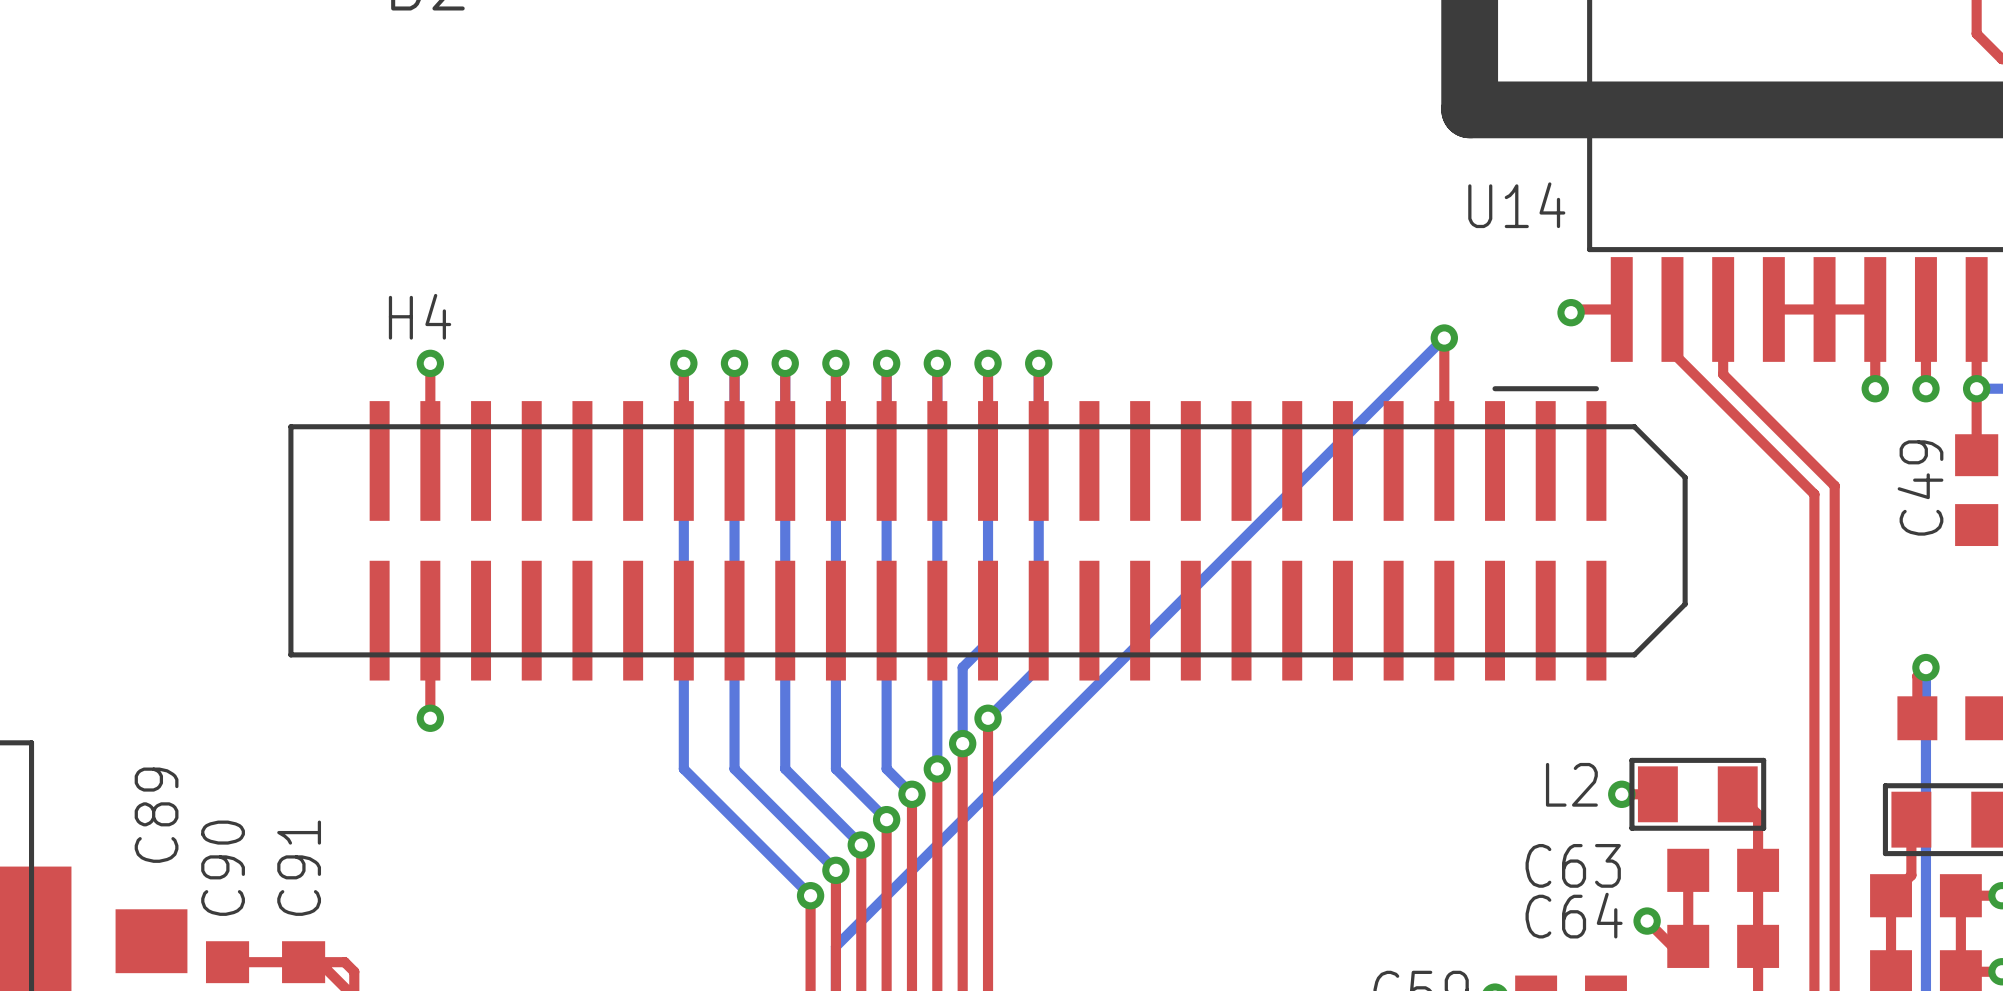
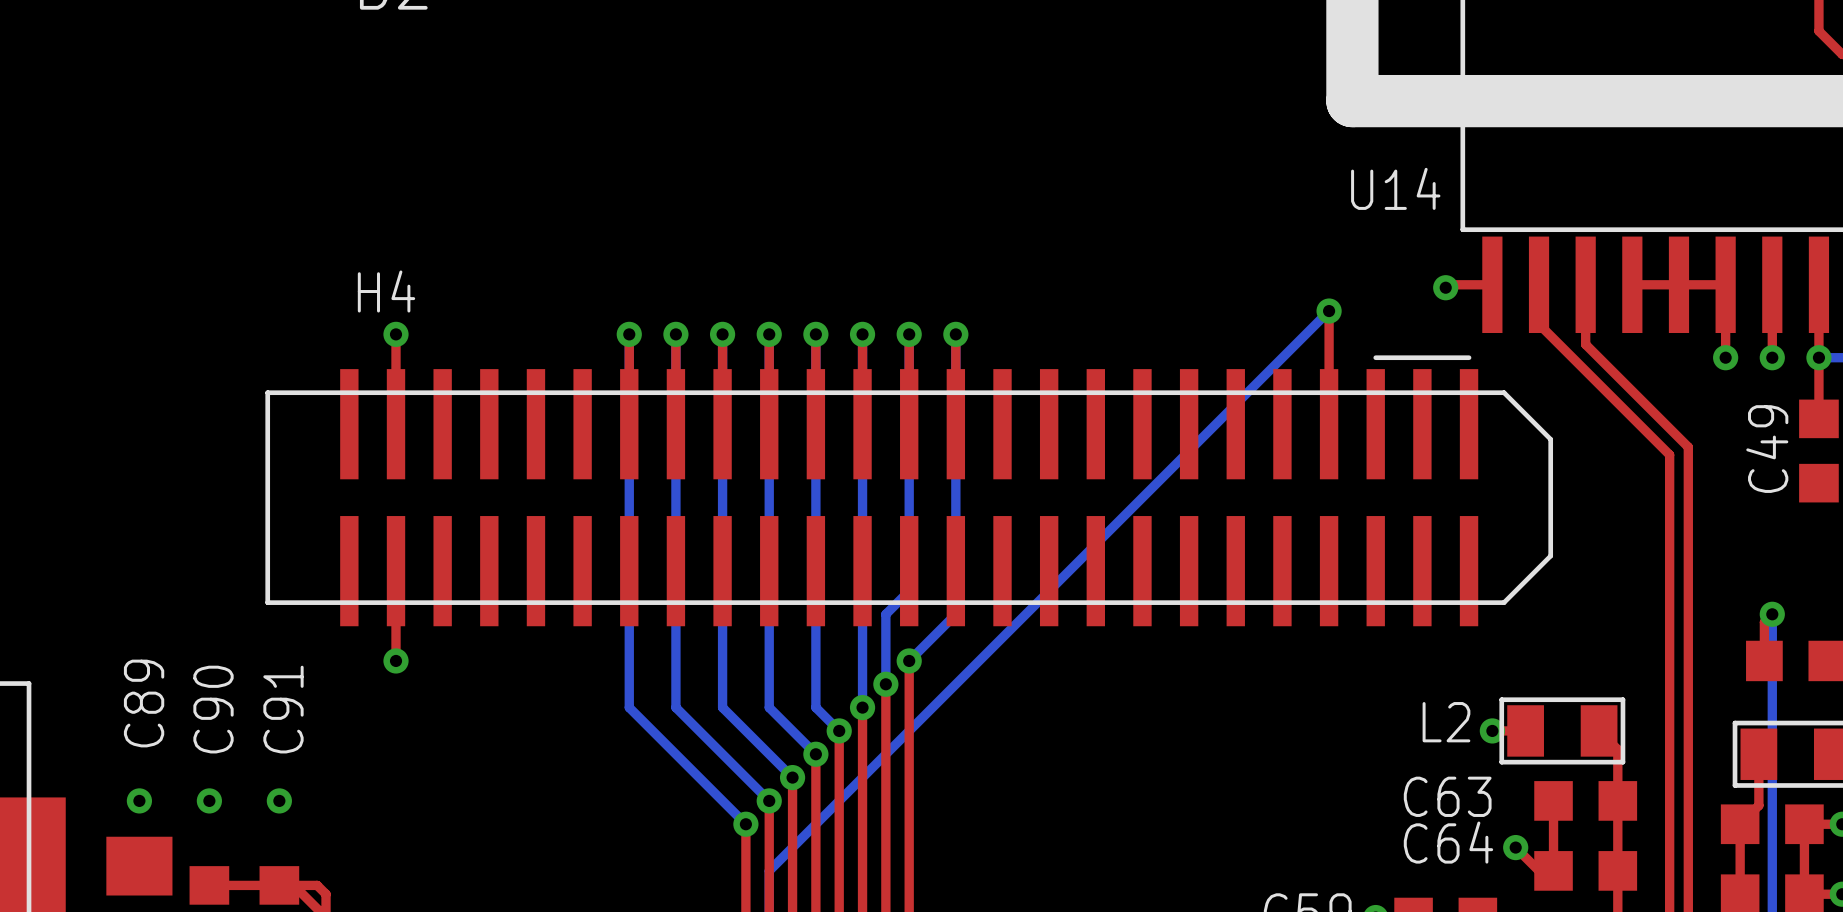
C89 name position: C89 (156, 815) -> C89 (144, 703)
C90 name position: C90 (223, 868) -> C90 (213, 709)
C91 name position: C91 (299, 868) -> C91 (283, 709)
via: none -> (139, 800)
via: none -> (209, 800)
via: none -> (279, 800)

